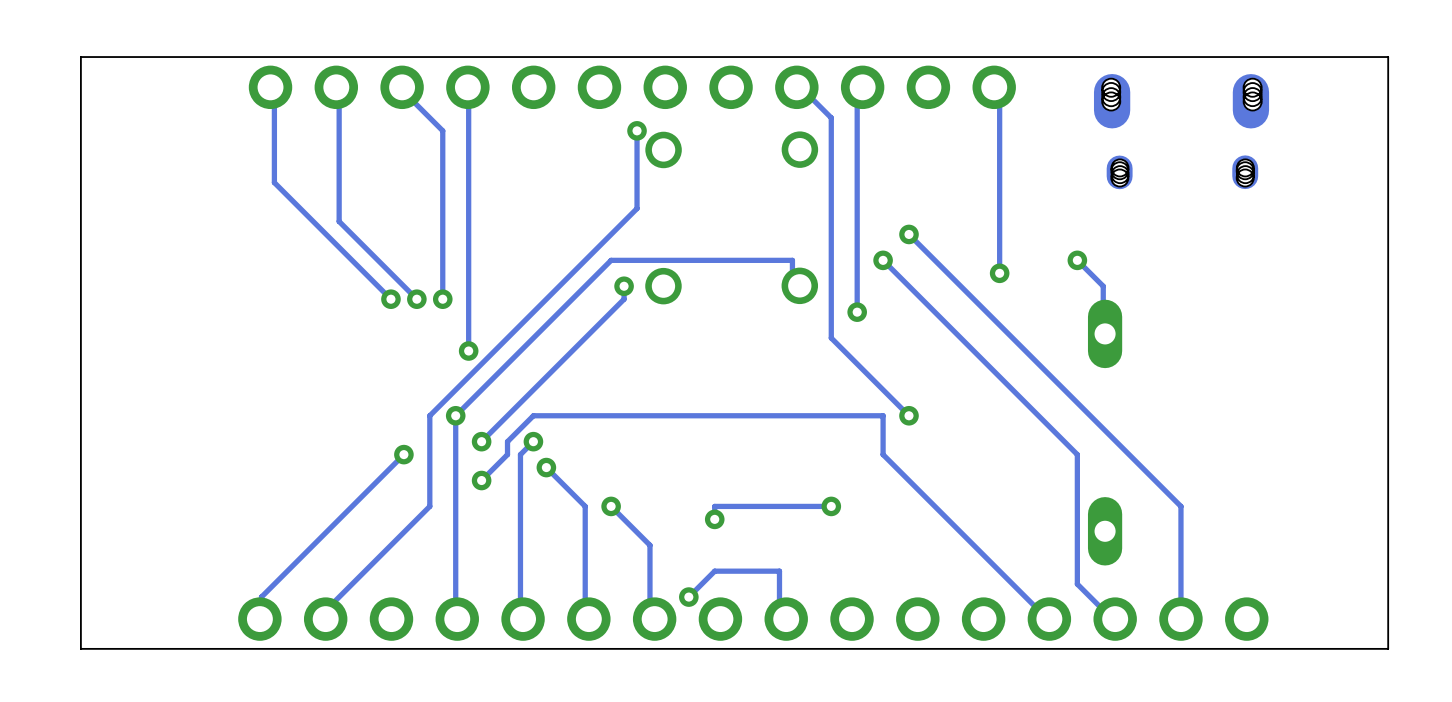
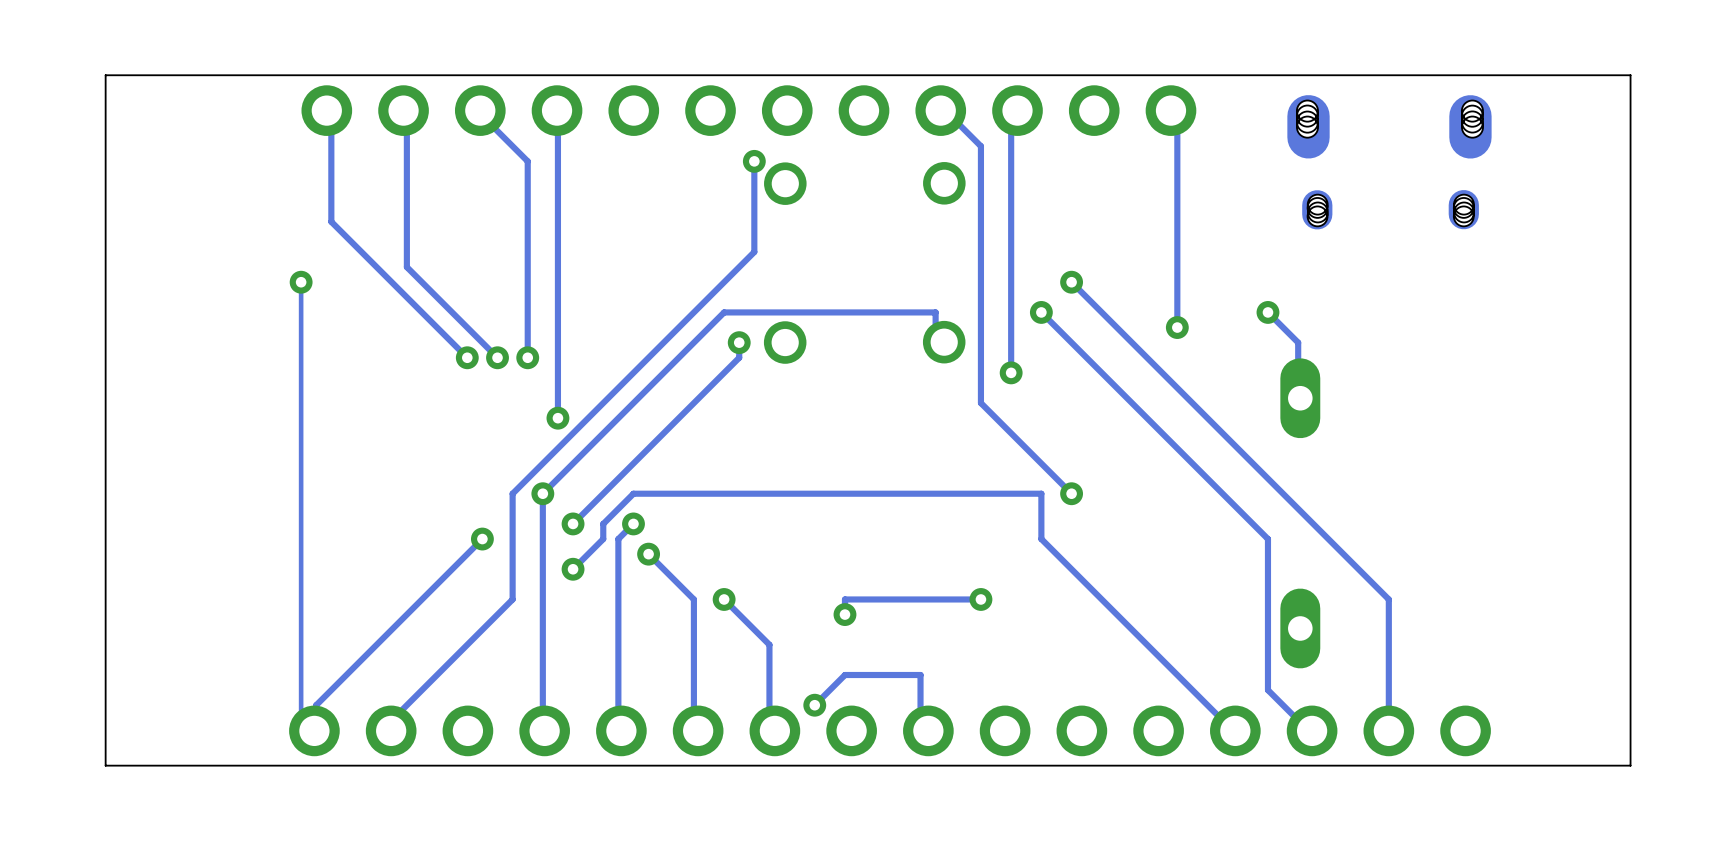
track: none -> (301, 282) (301, 717) (314, 730)
via: none -> (301, 282)

